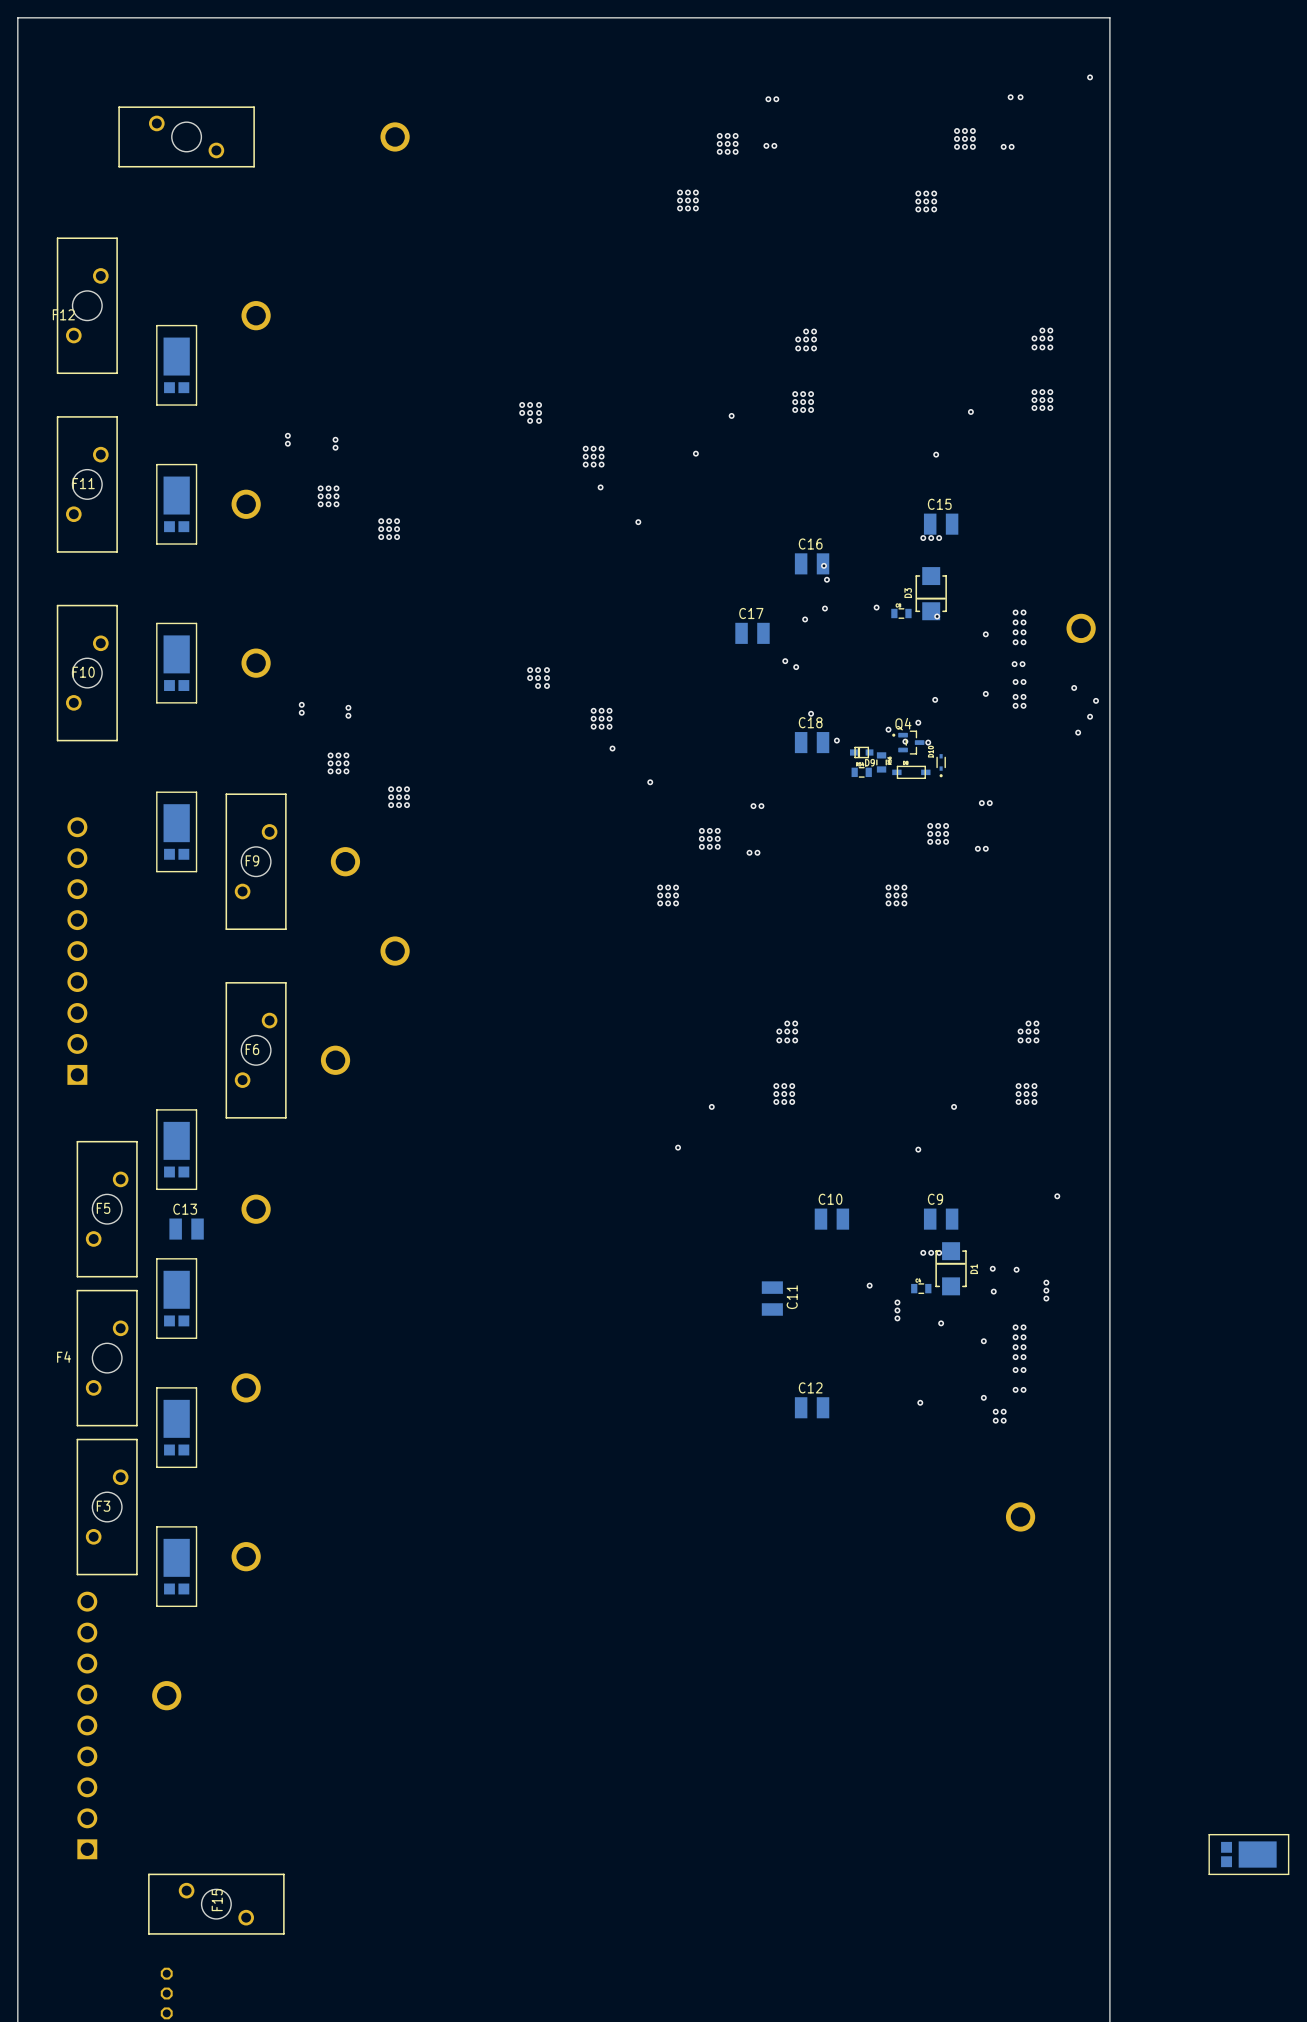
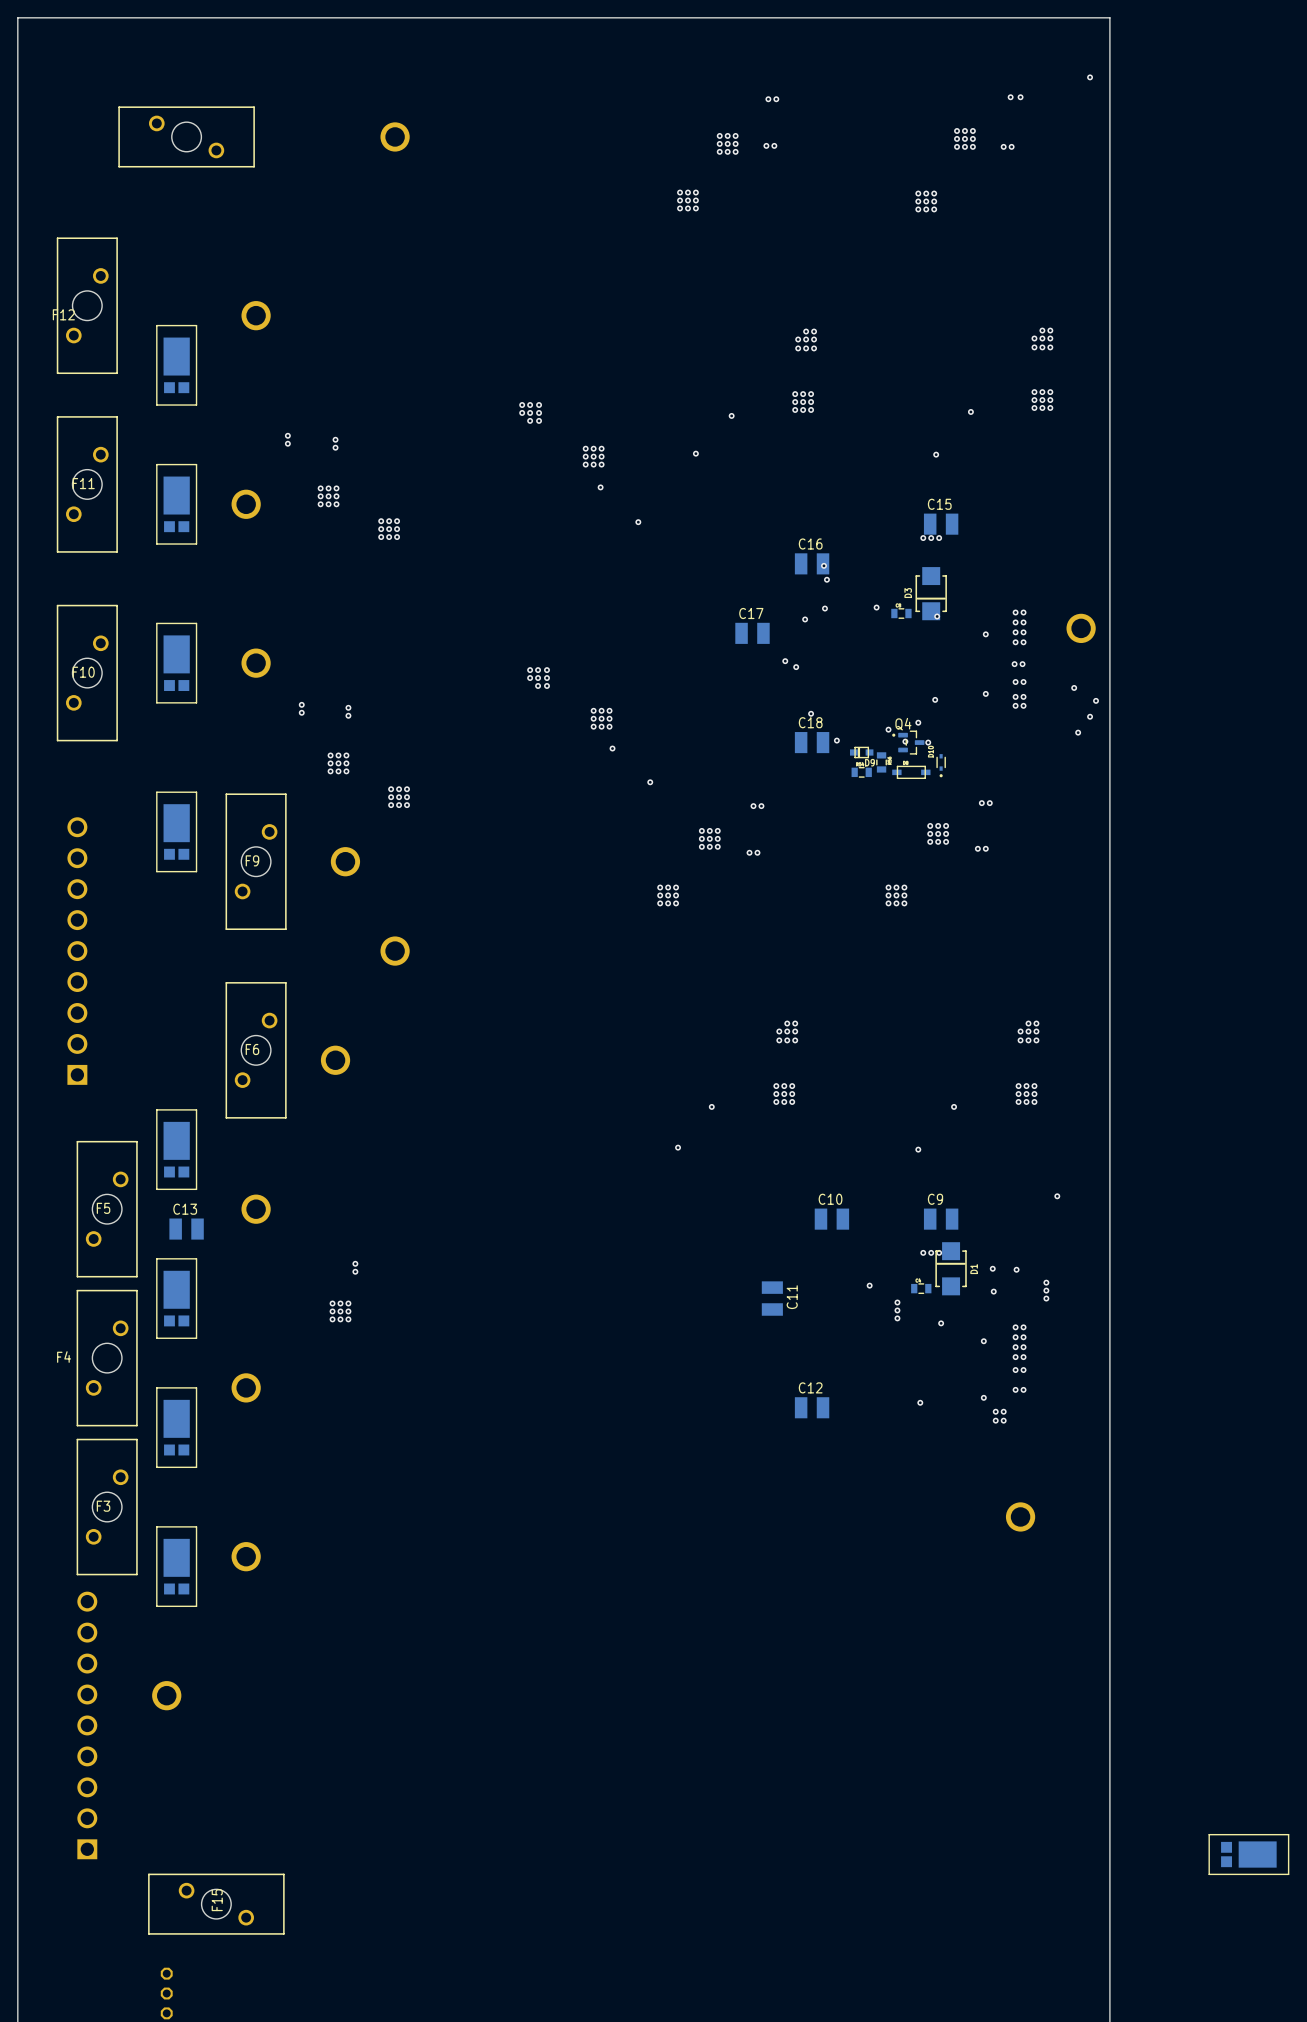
via: none -> (355, 1263)
via: none -> (355, 1271)
via: none -> (332, 1303)
via: none -> (340, 1303)
via: none -> (348, 1303)
via: none -> (332, 1311)
via: none -> (340, 1311)
via: none -> (348, 1311)
via: none -> (332, 1319)
via: none -> (340, 1319)
via: none -> (348, 1319)

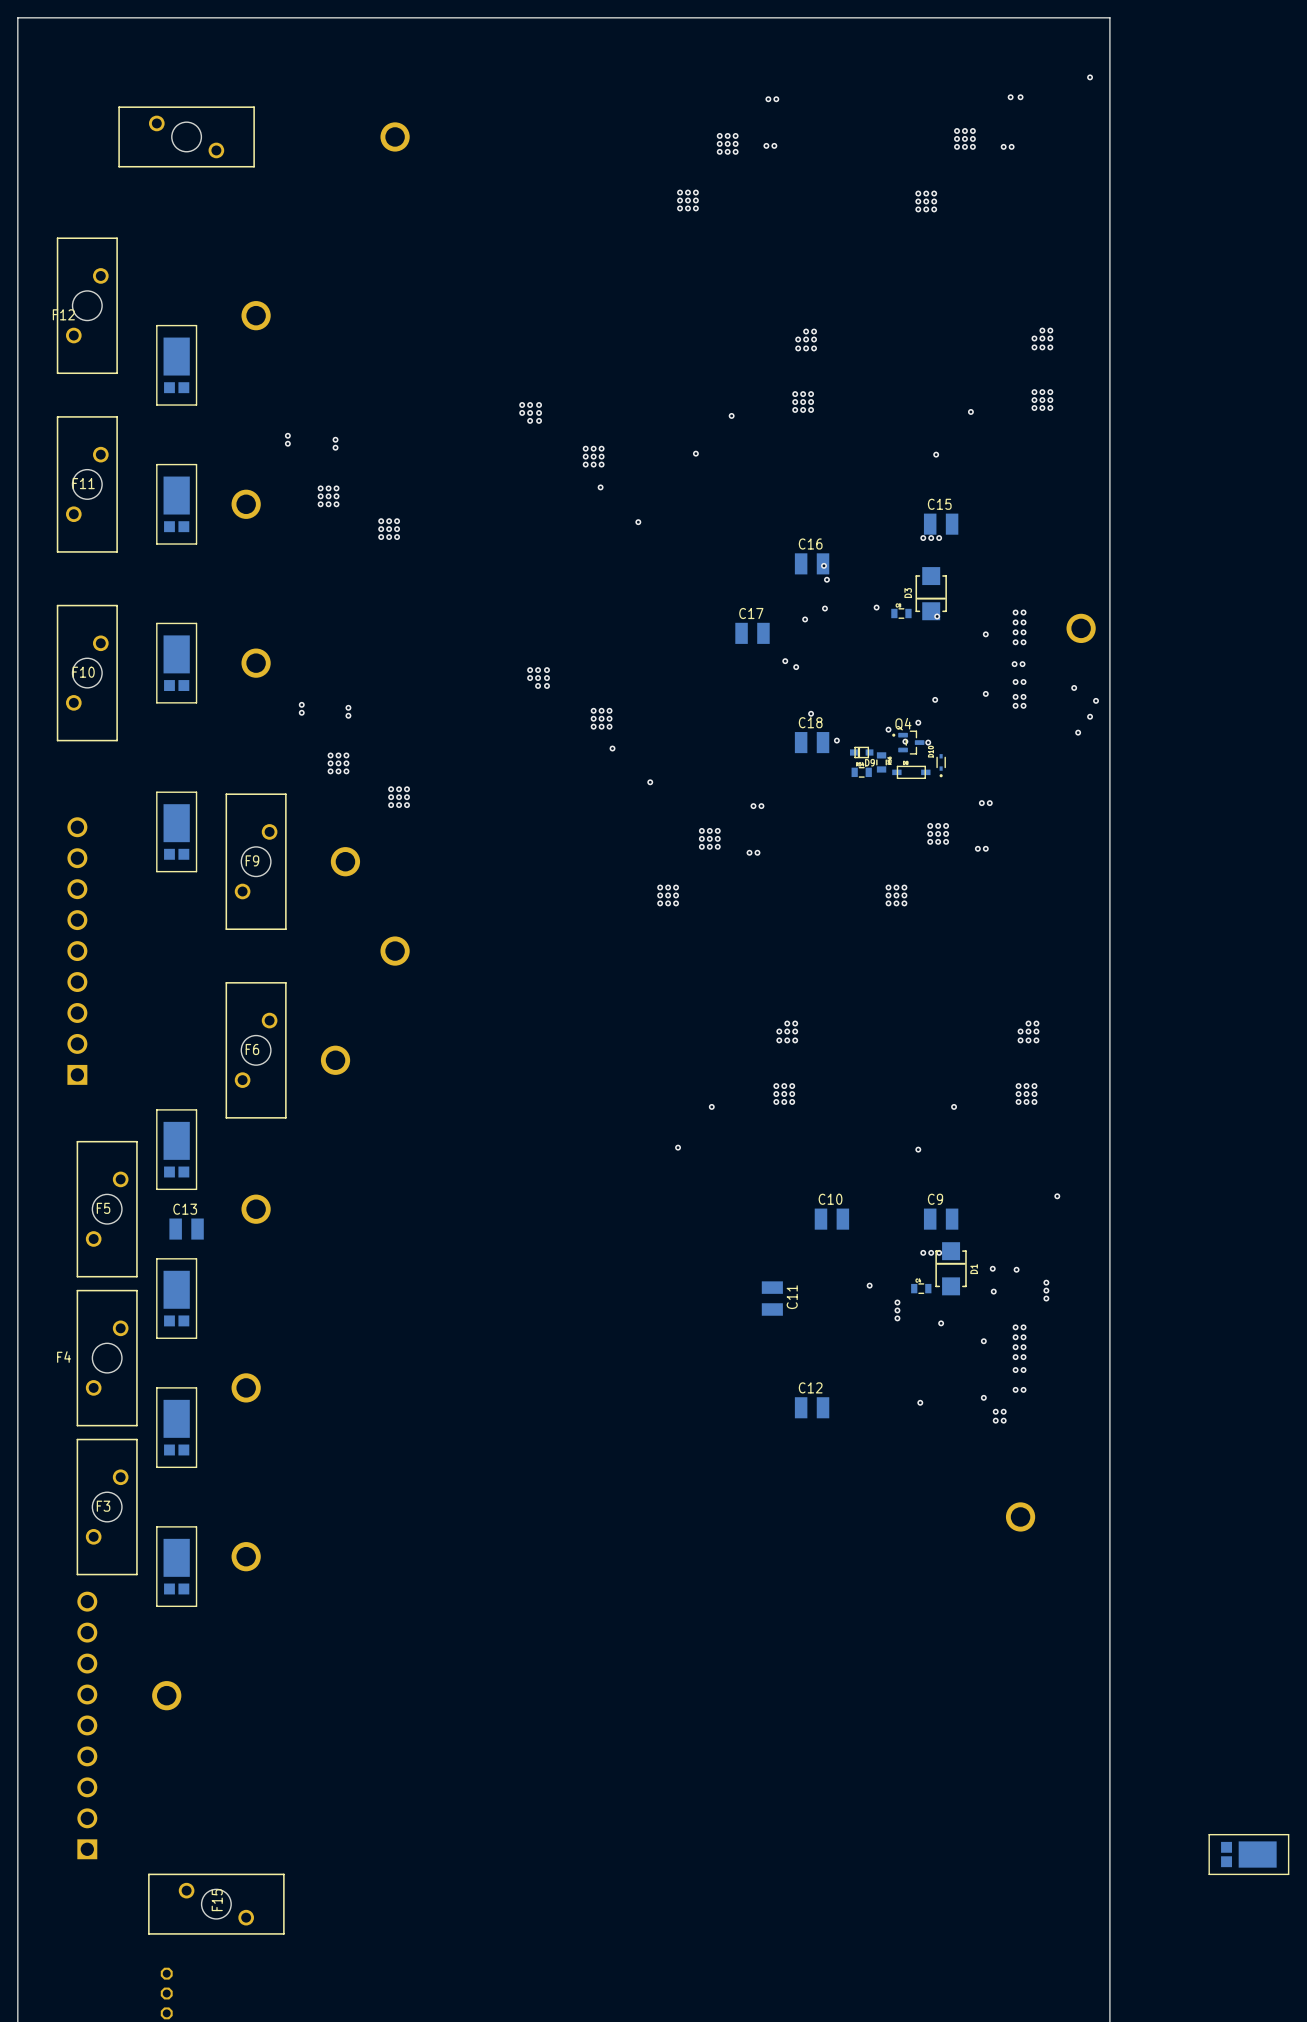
via: (355, 1263) -> none
via: (355, 1271) -> none
via: (332, 1303) -> none
via: (340, 1303) -> none
via: (348, 1303) -> none
via: (332, 1311) -> none
via: (340, 1311) -> none
via: (348, 1311) -> none
via: (332, 1319) -> none
via: (340, 1319) -> none
via: (348, 1319) -> none

